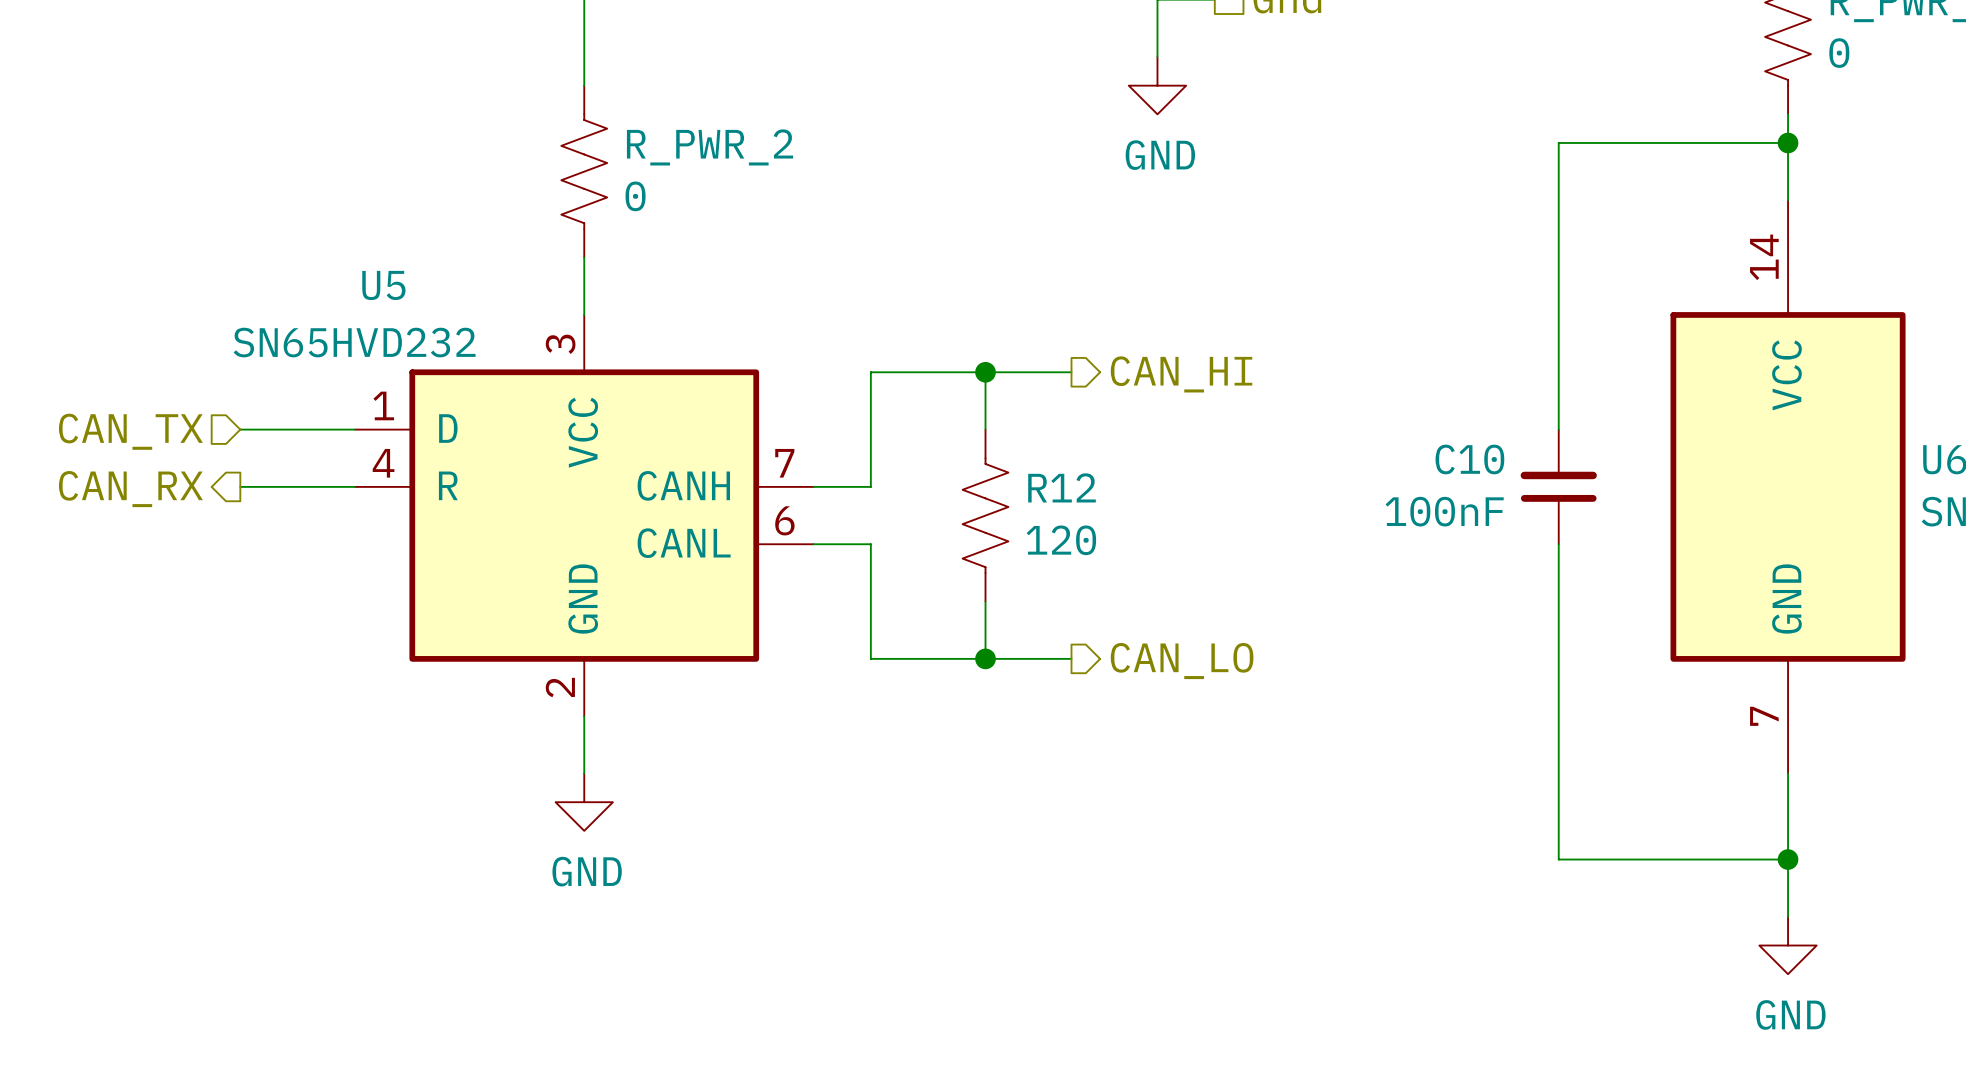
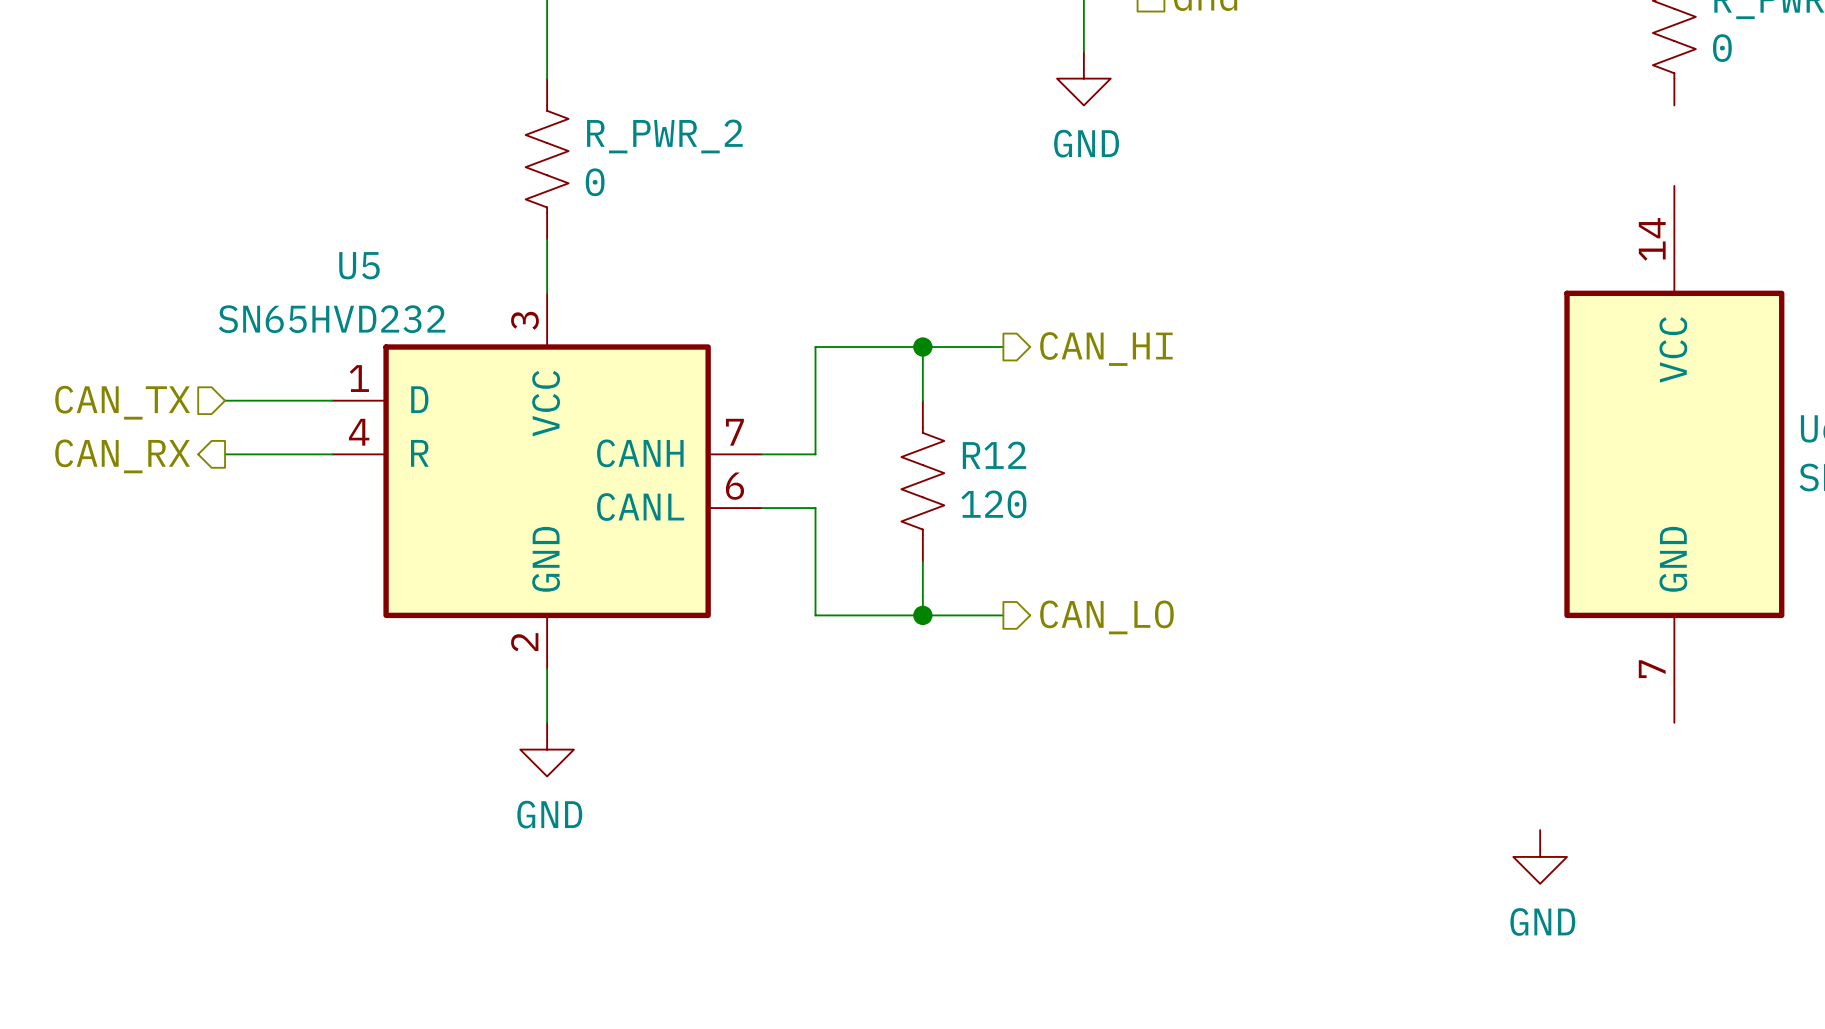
wire: (1788, 114) (1788, 200) -> none
wire: (1788, 142) (1558, 142) (1558, 429) -> none
junction: (1788, 142) -> none
C10: 100nF (1558, 486) -> none
wire: (1558, 544) (1558, 859) (1788, 859) -> none
wire: (1788, 773) (1788, 916) -> none
junction: (1788, 859) -> none
power symbol position: GND (1788, 945) -> GND (1540, 856)

